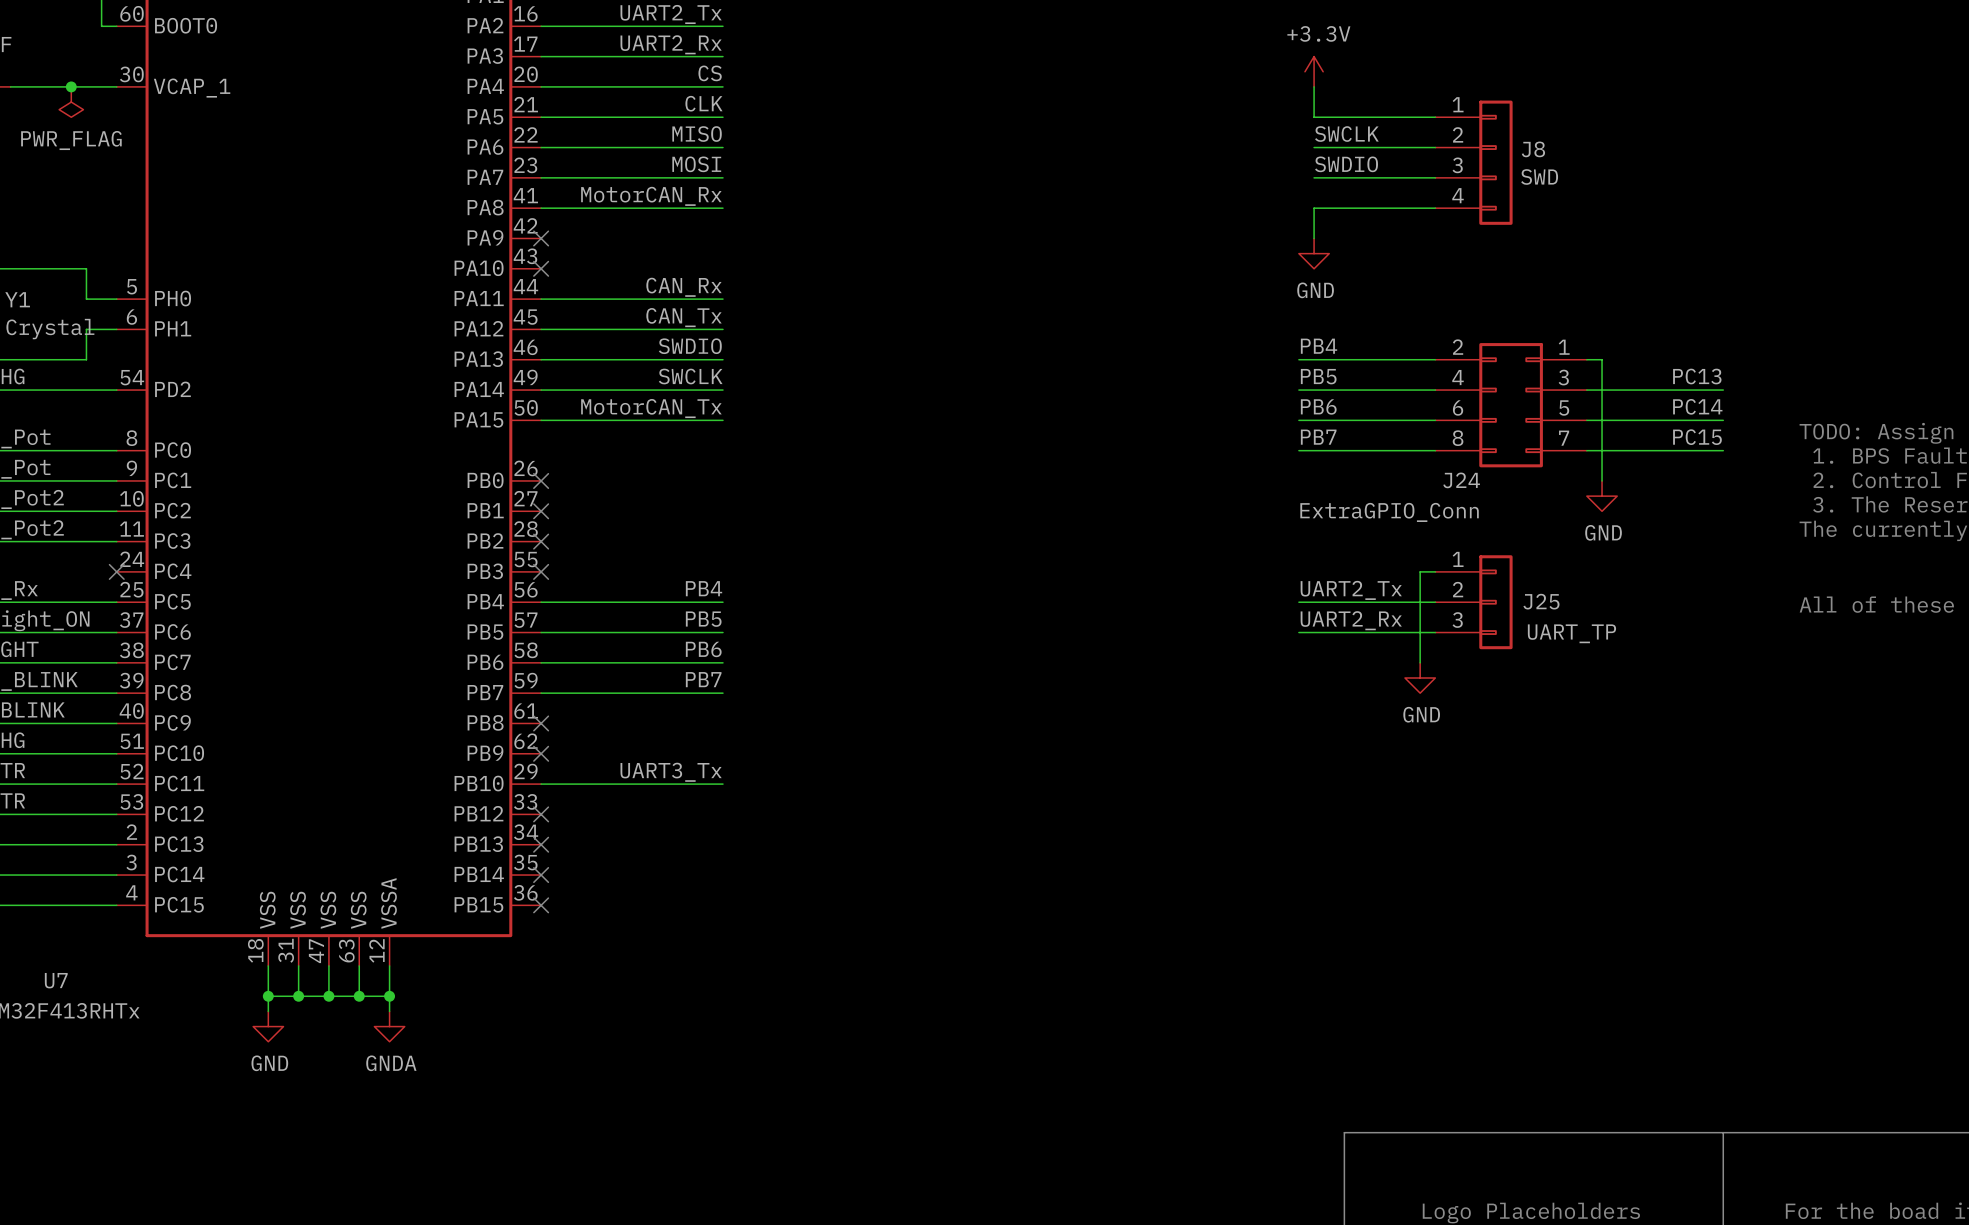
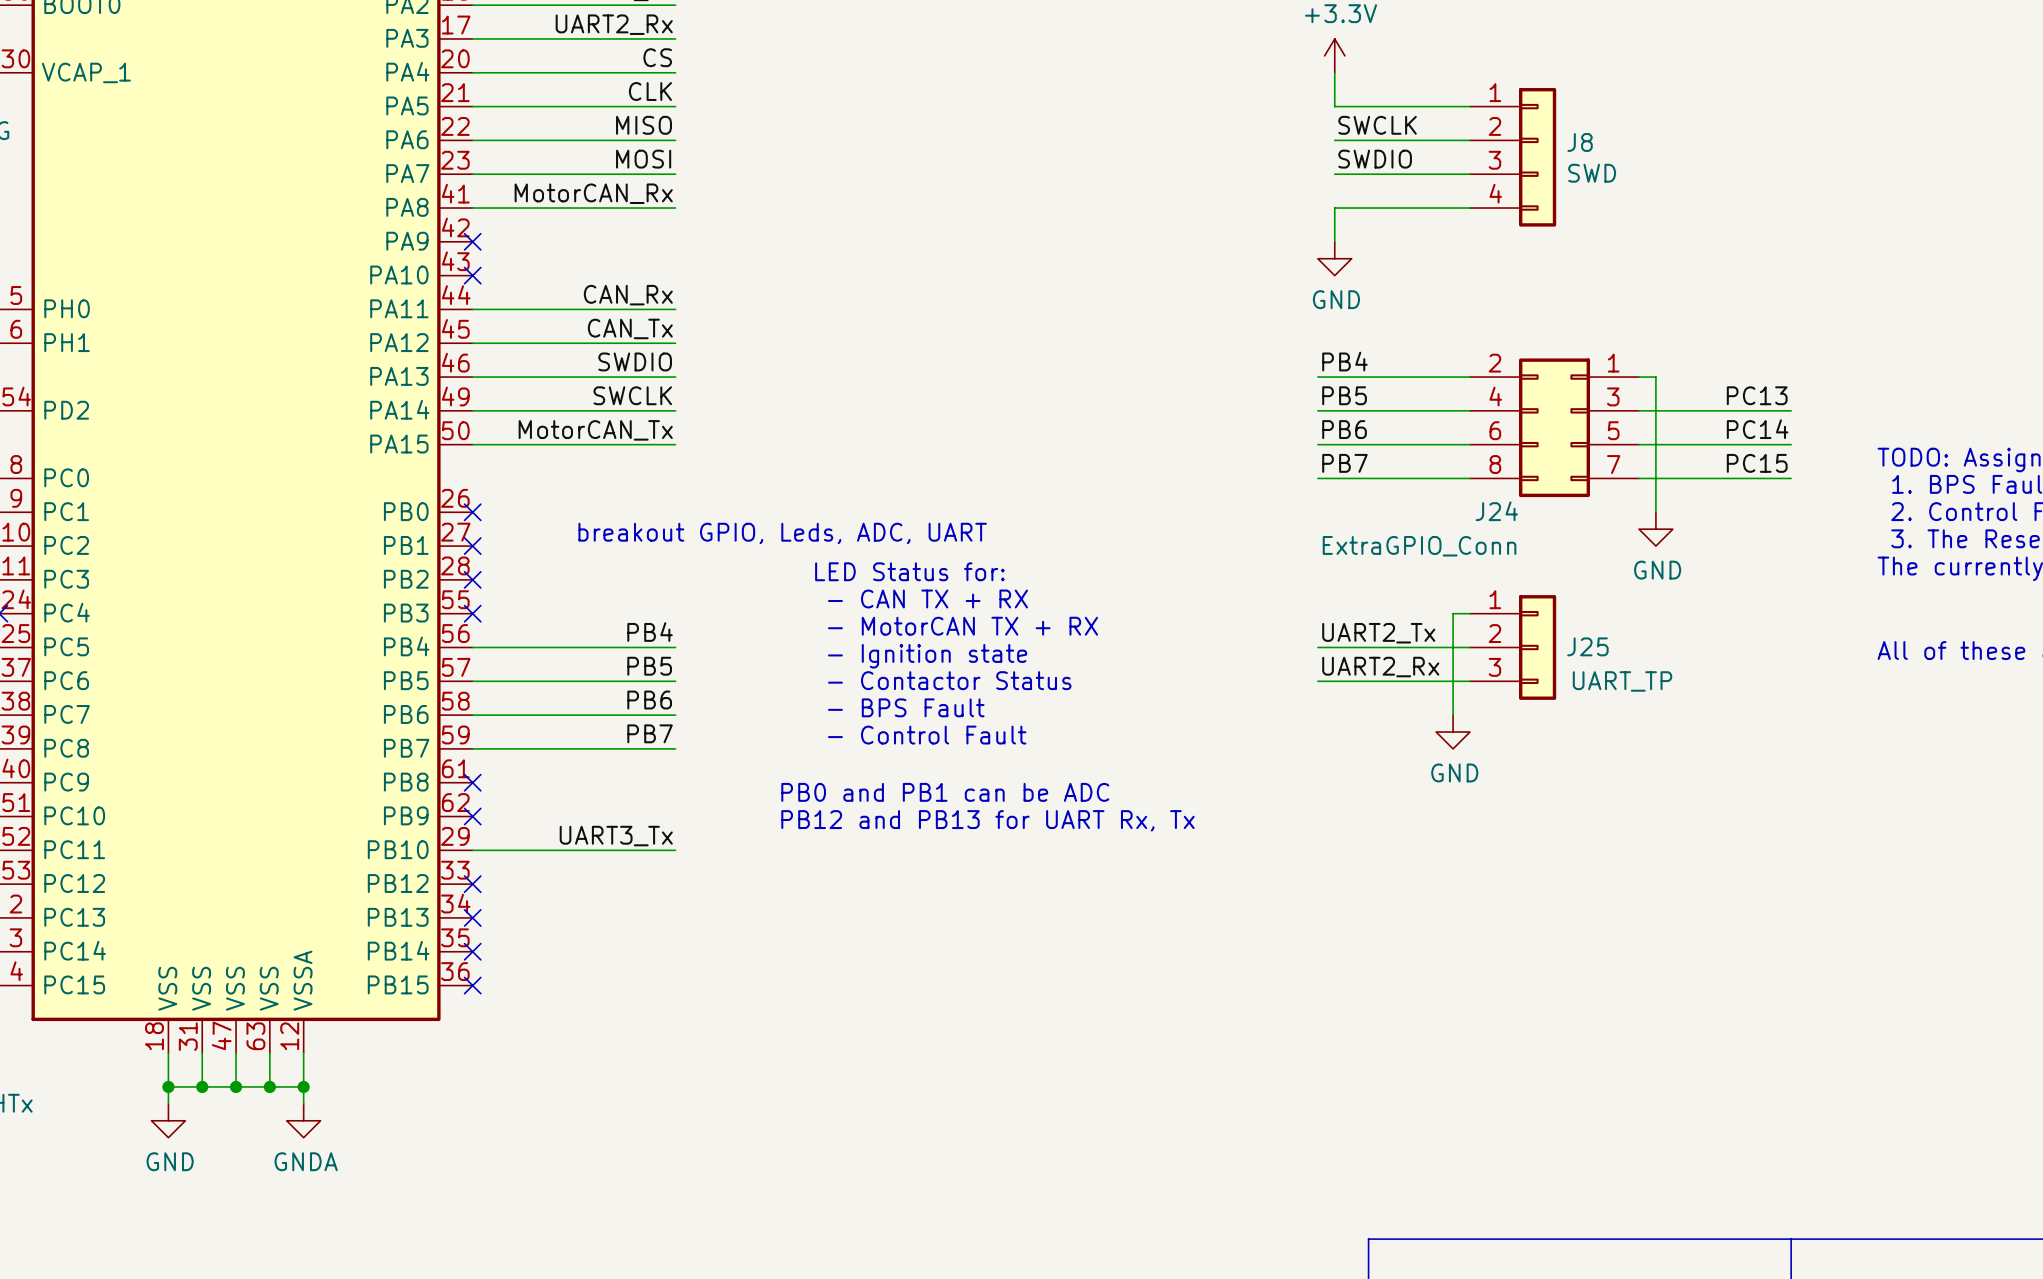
text: none -> breakout GPIO, Leds, ADC, UART (782, 533)
text: none -> LED Status for: (909, 571)
text: none -> - CAN TX + RX (928, 598)
text: none -> - MotorCAN TX + RX (963, 626)
text: none -> - Ignition state (927, 656)
text: none -> - Contactor Status (949, 680)
text: none -> - BPS Fault (906, 707)
text: none -> - Control Fault (927, 735)
text: none -> PB0 and PB1 can be ADC (945, 792)
text: none -> PB12 and PB13 for UART Rx, Tx (987, 820)

